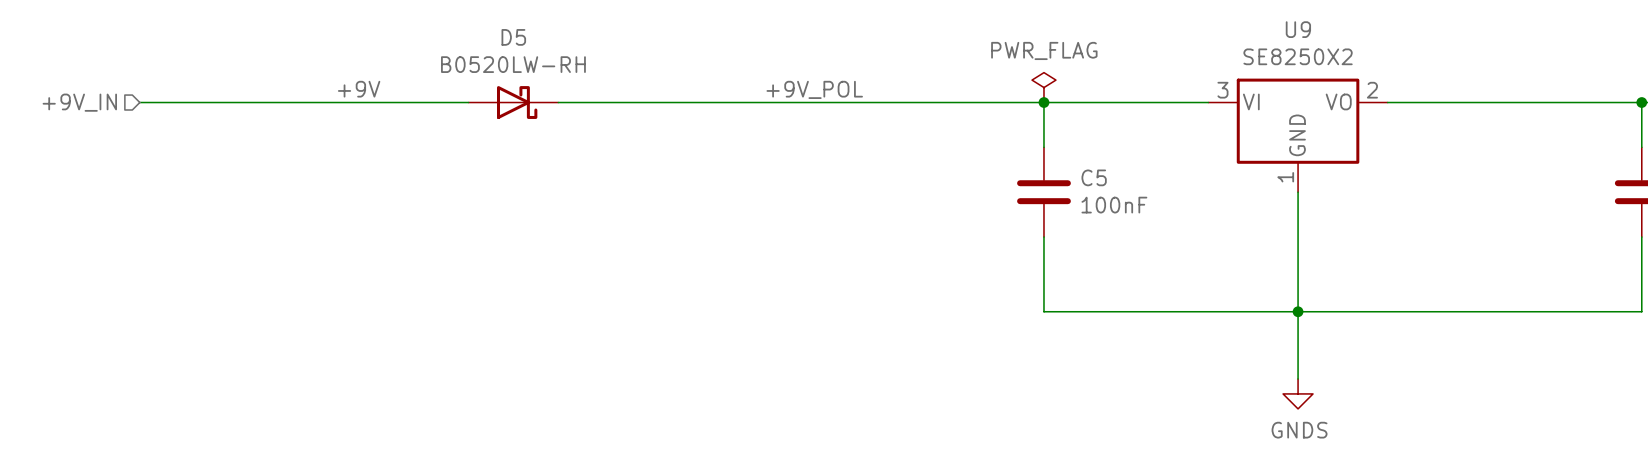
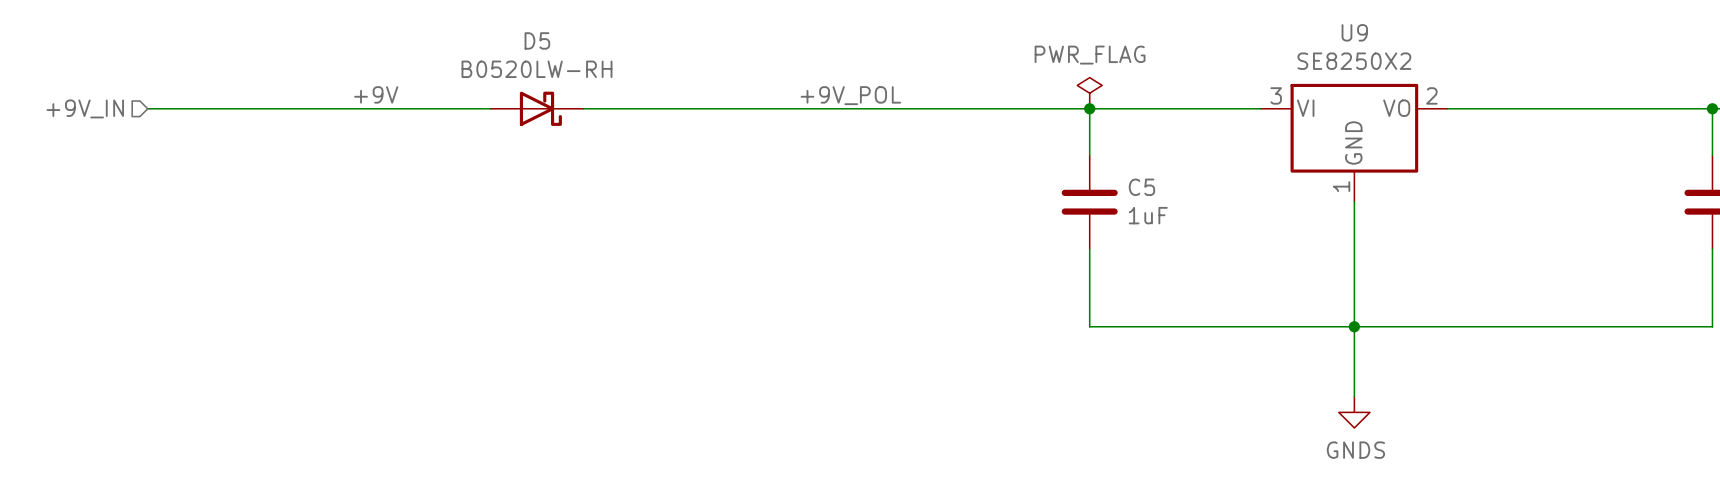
C5 value: 100nF (1114, 205) -> 1uF (1148, 215)

